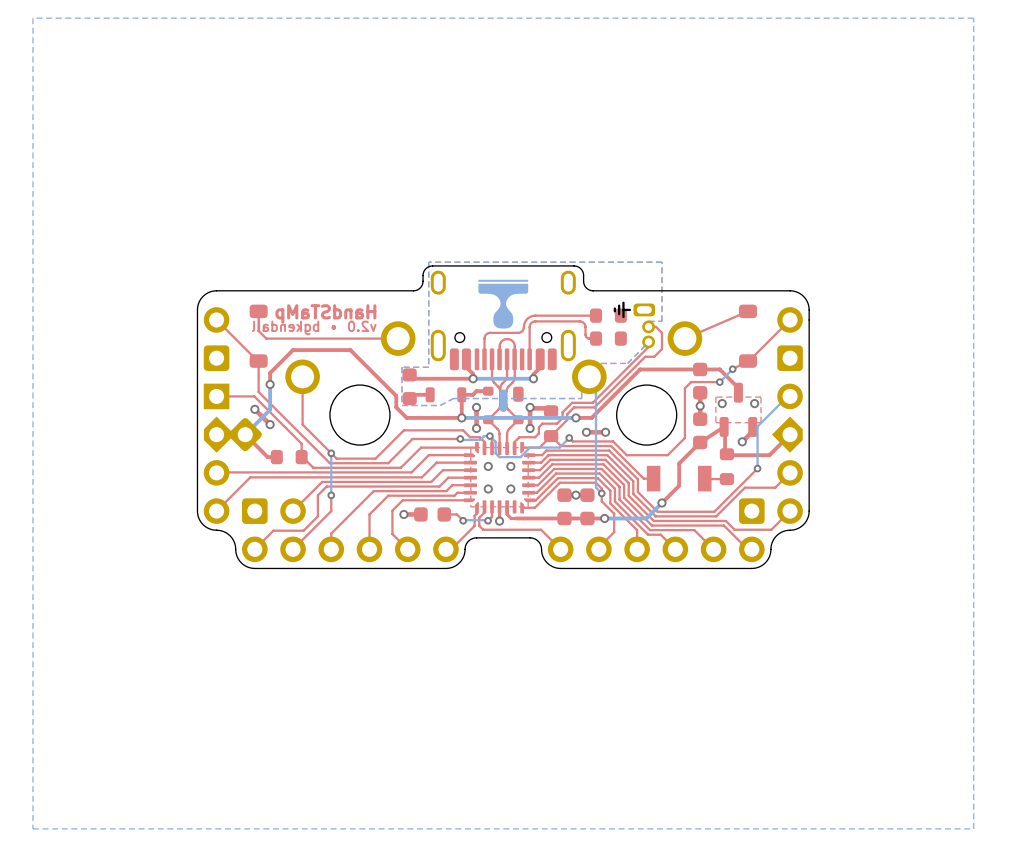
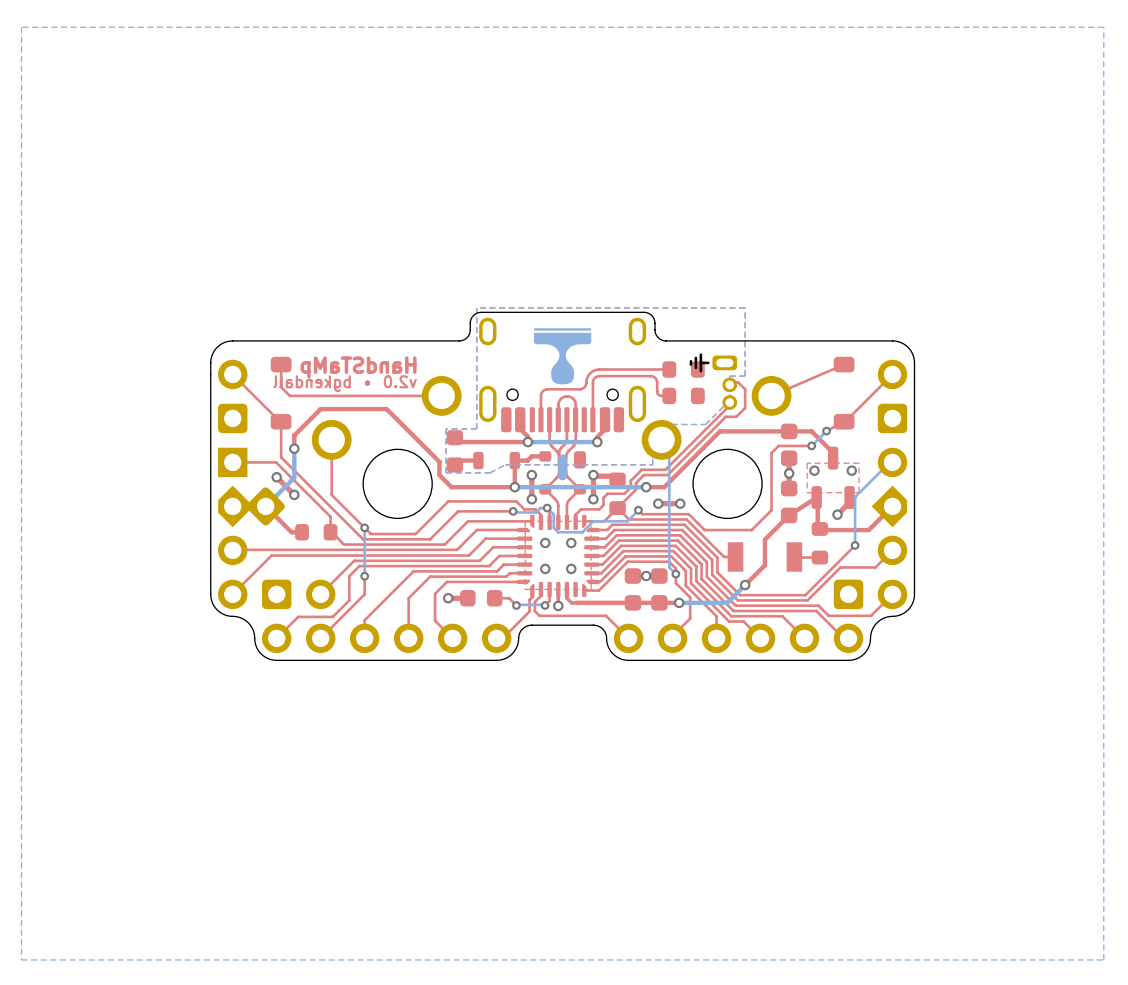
part footprint: [633, 303, 655, 349] -> [712, 355, 738, 410]

